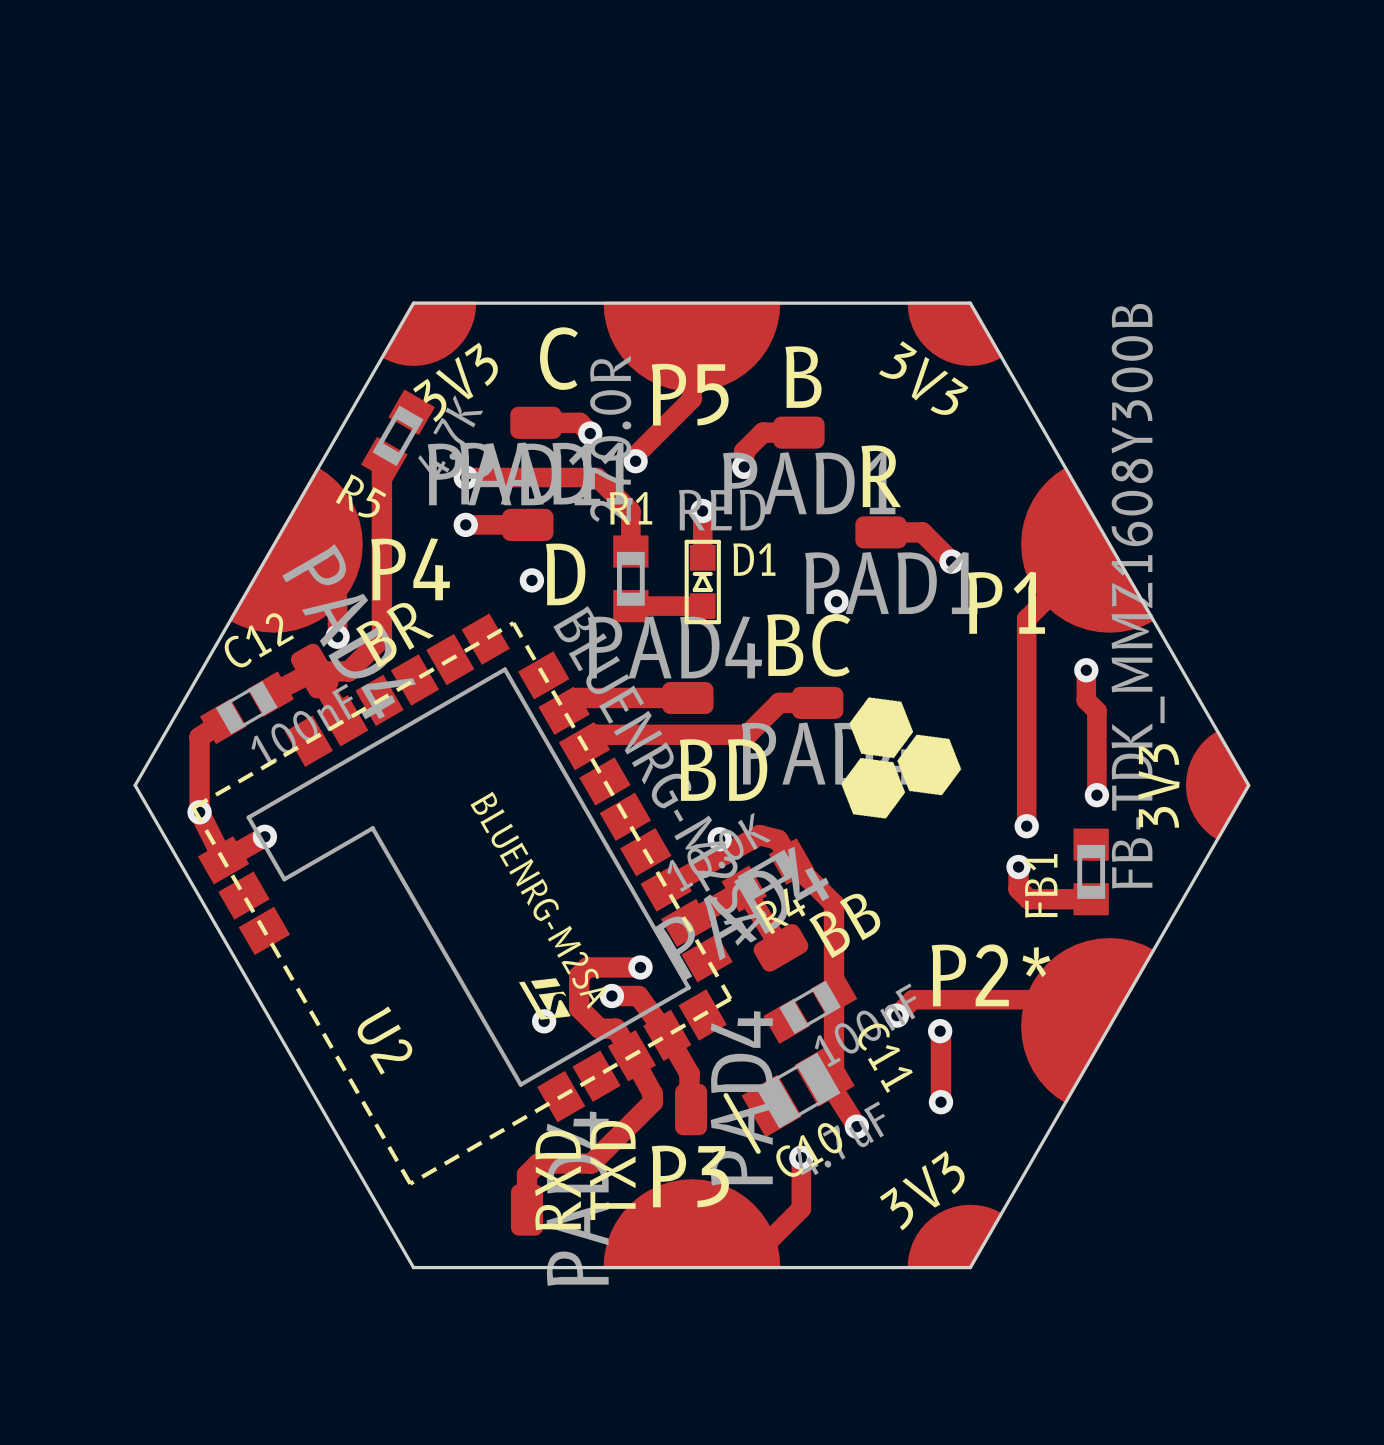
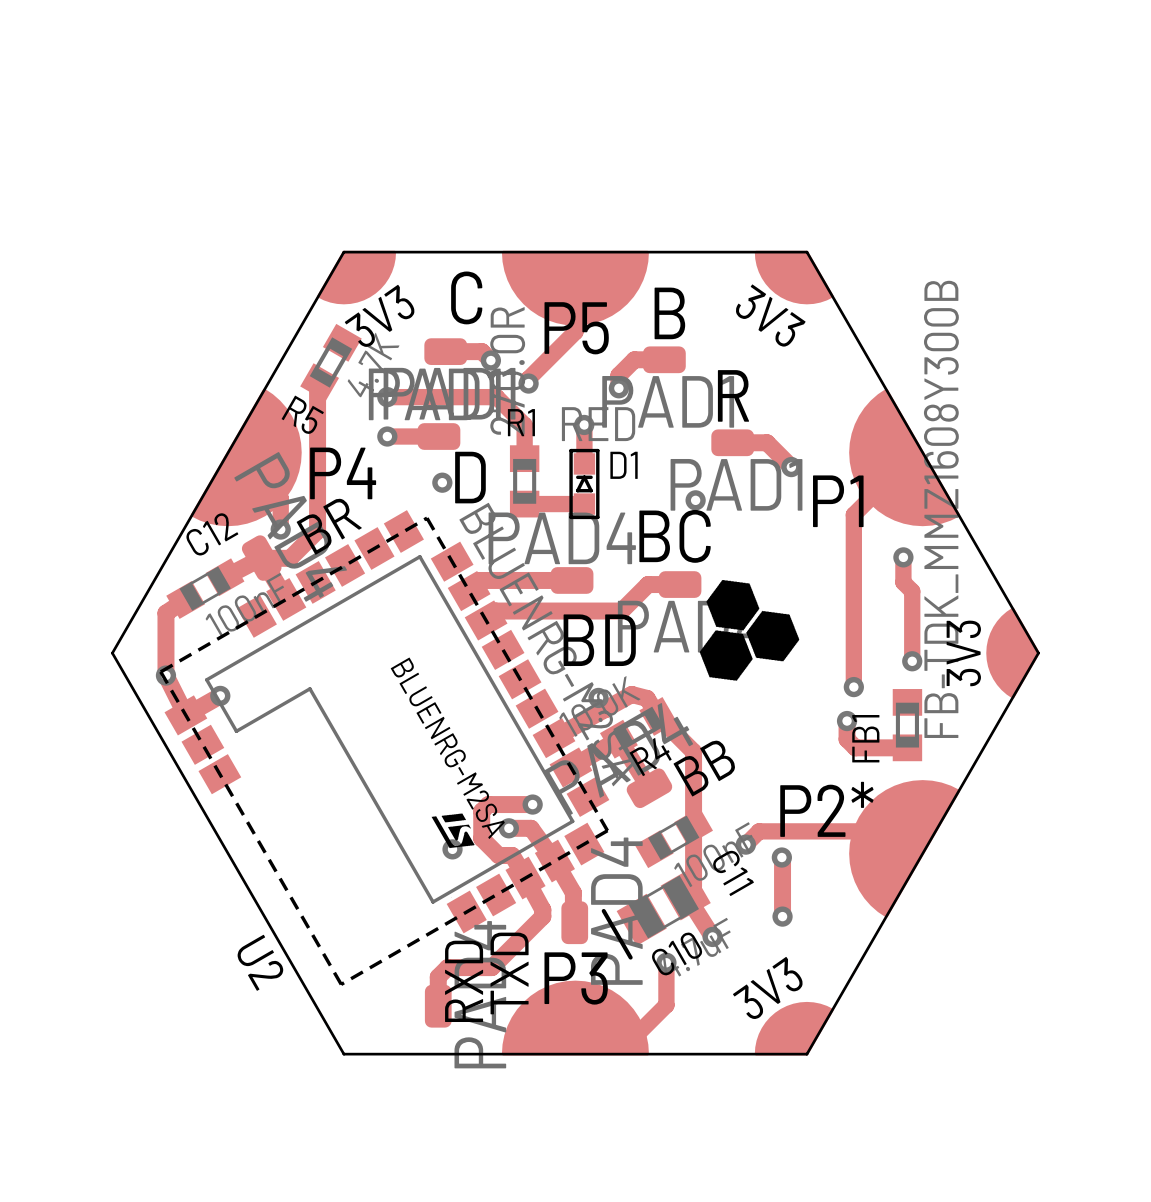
U2 name position: U2 (384, 1040) -> U2 (260, 962)

